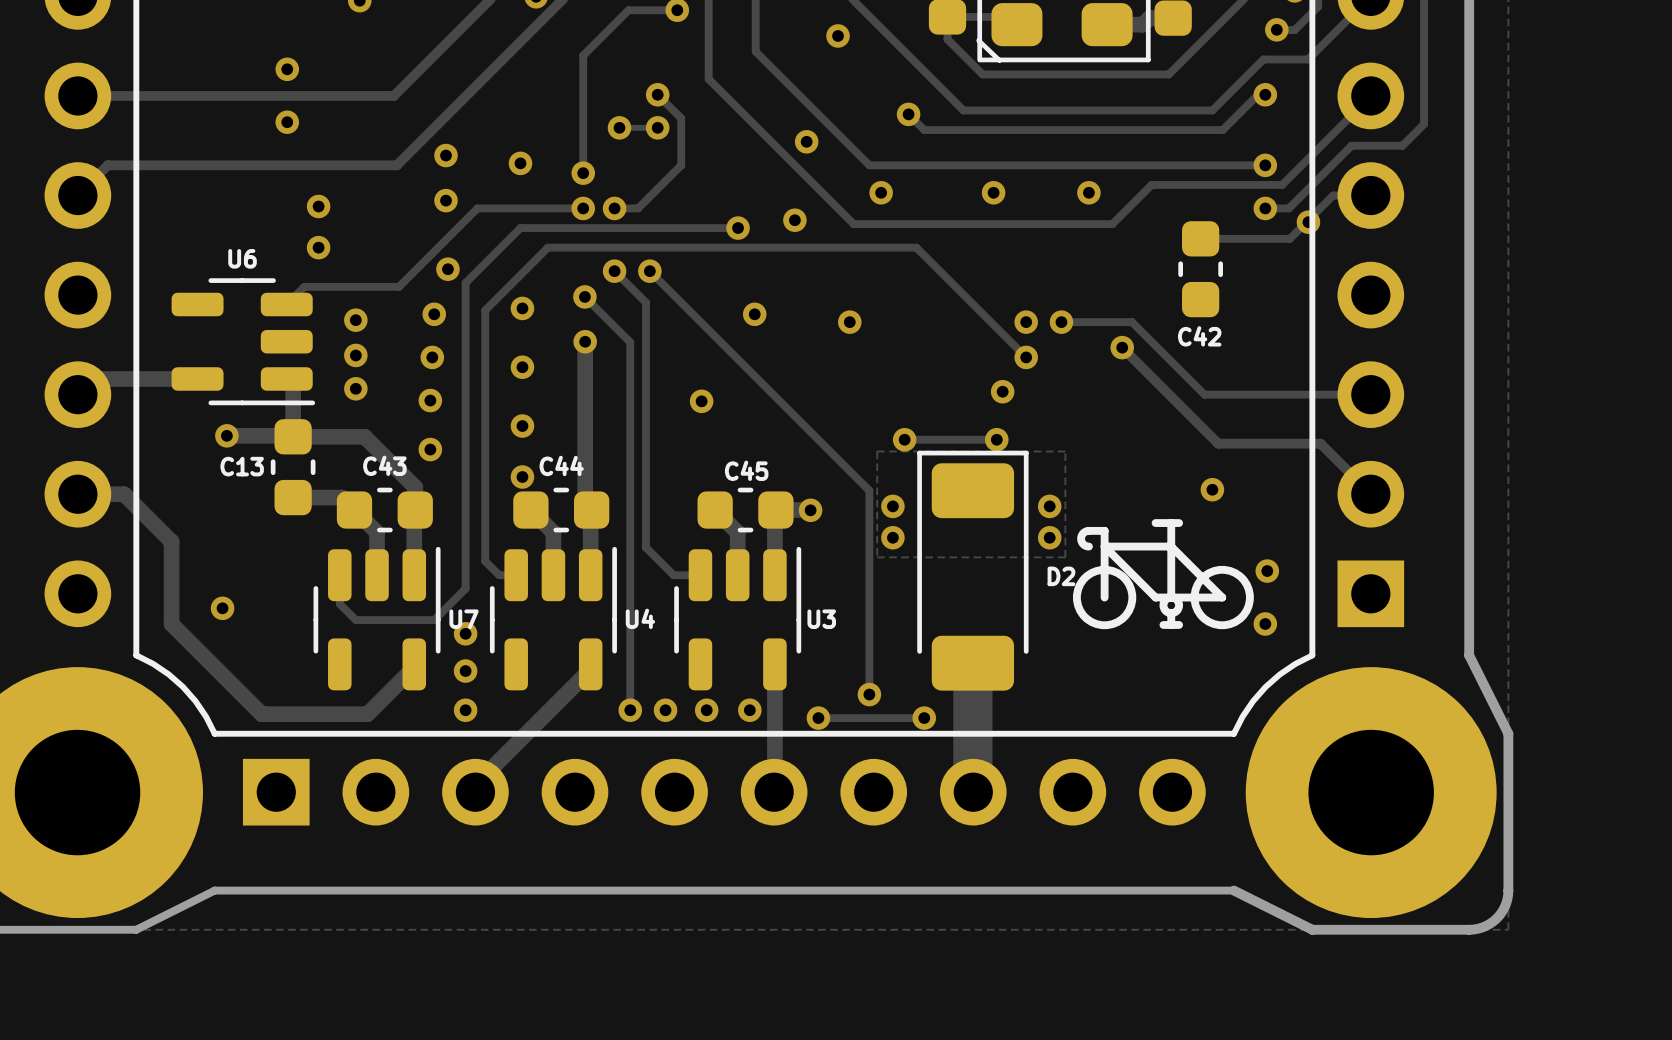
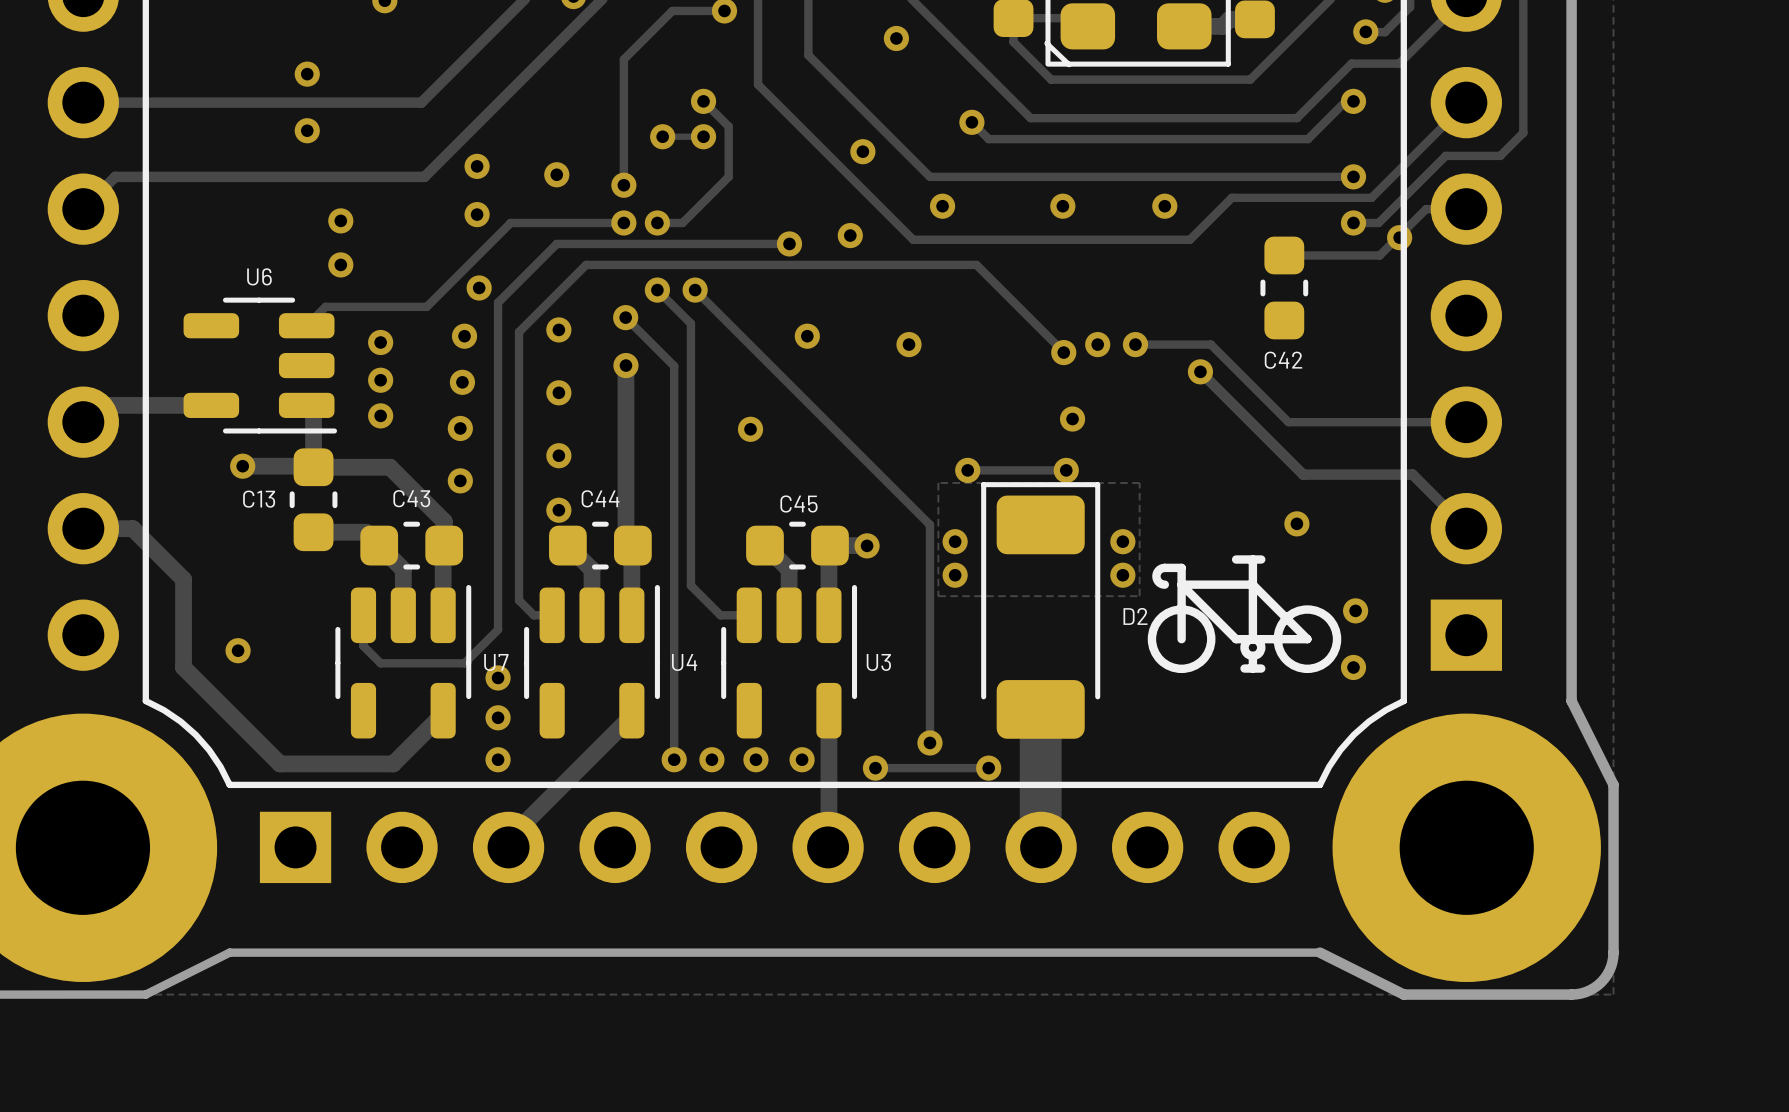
track: (912, 247) (916, 247) (1026, 357) -> (976, 264) (1063, 352)
via position: (1026, 357) -> (1063, 352)

